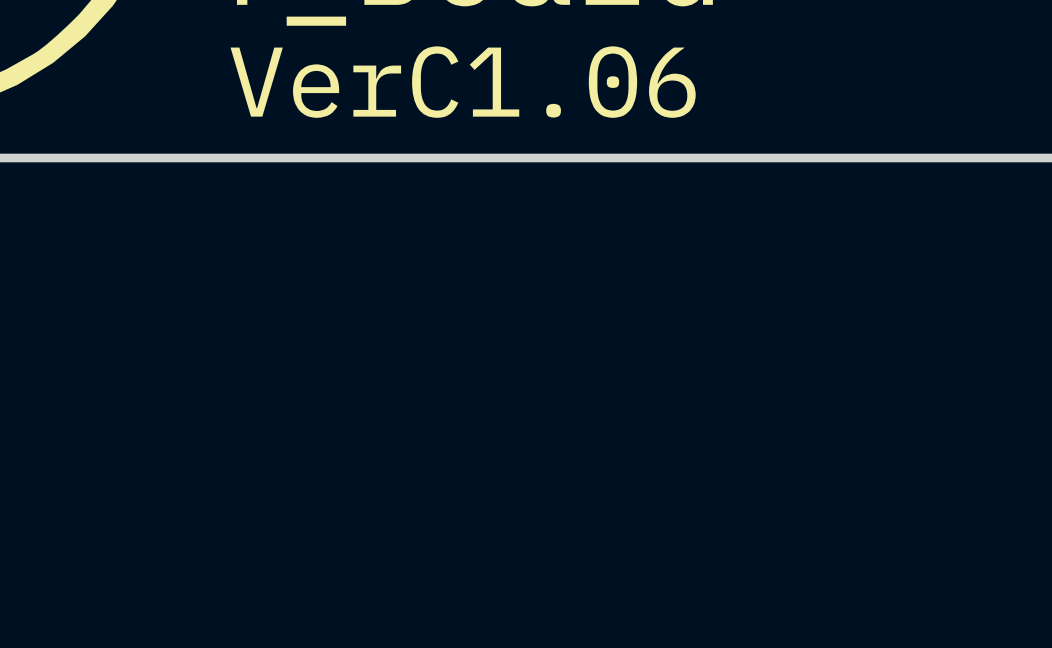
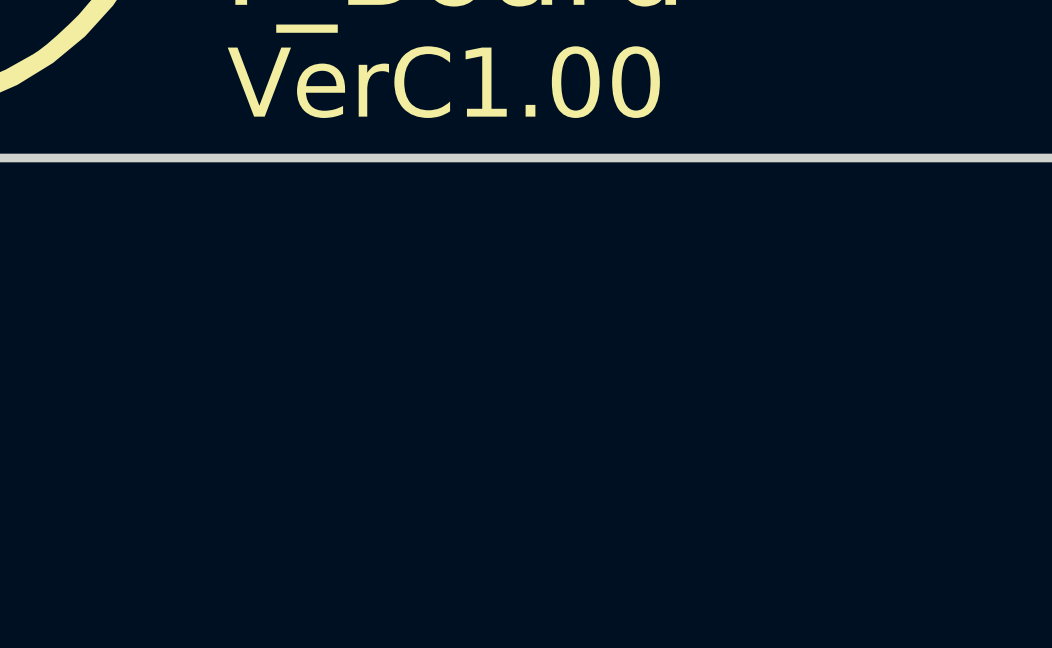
text: VerC1.06 (463, 82) -> VerC1.00 (443, 82)

